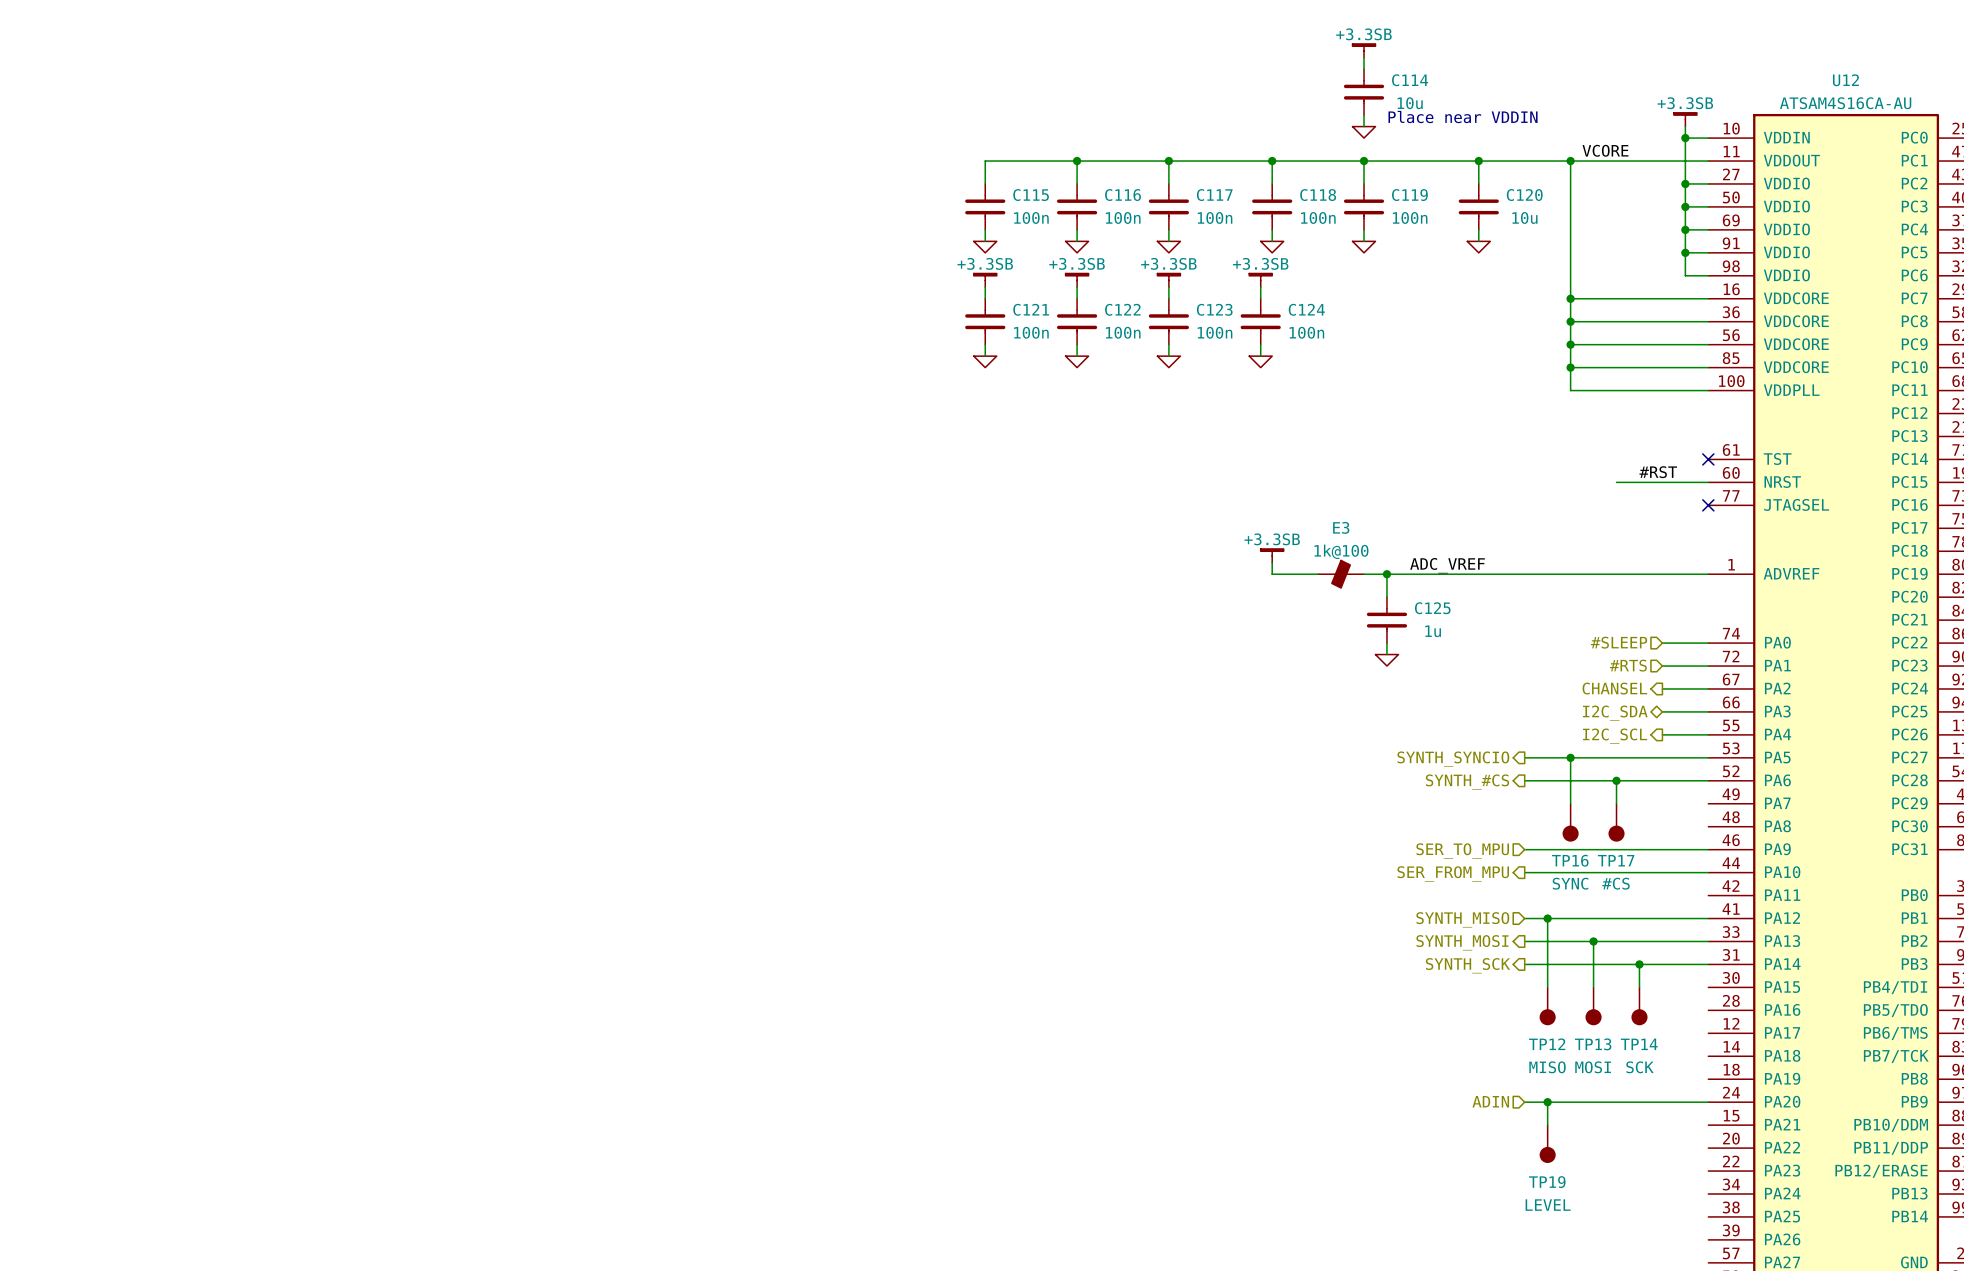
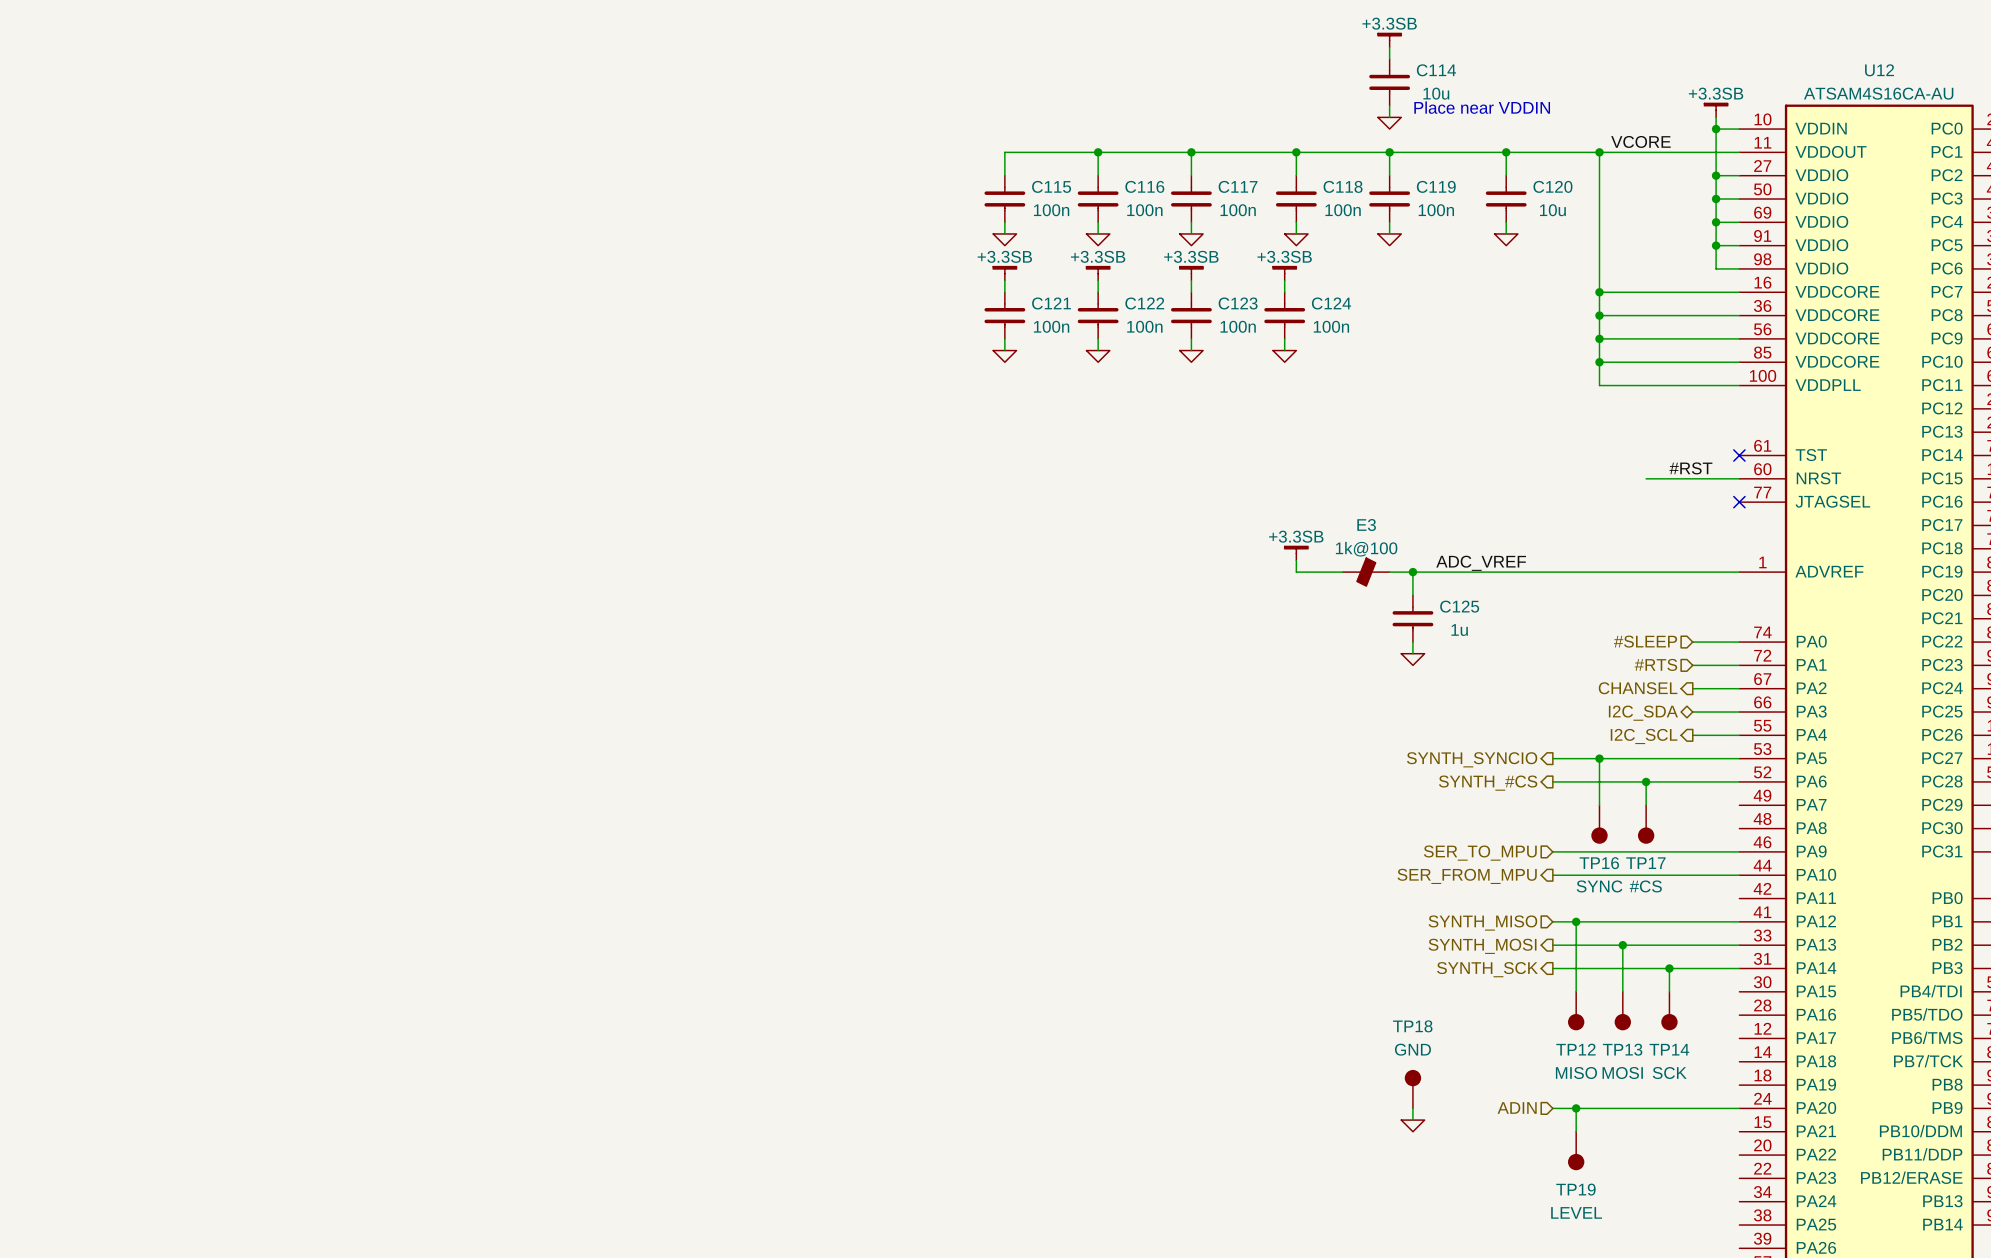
TP18: none -> GND (1412, 1089)
wire: none -> (1412, 1108) (1412, 1120)
power symbol: none -> (1412, 1125)

